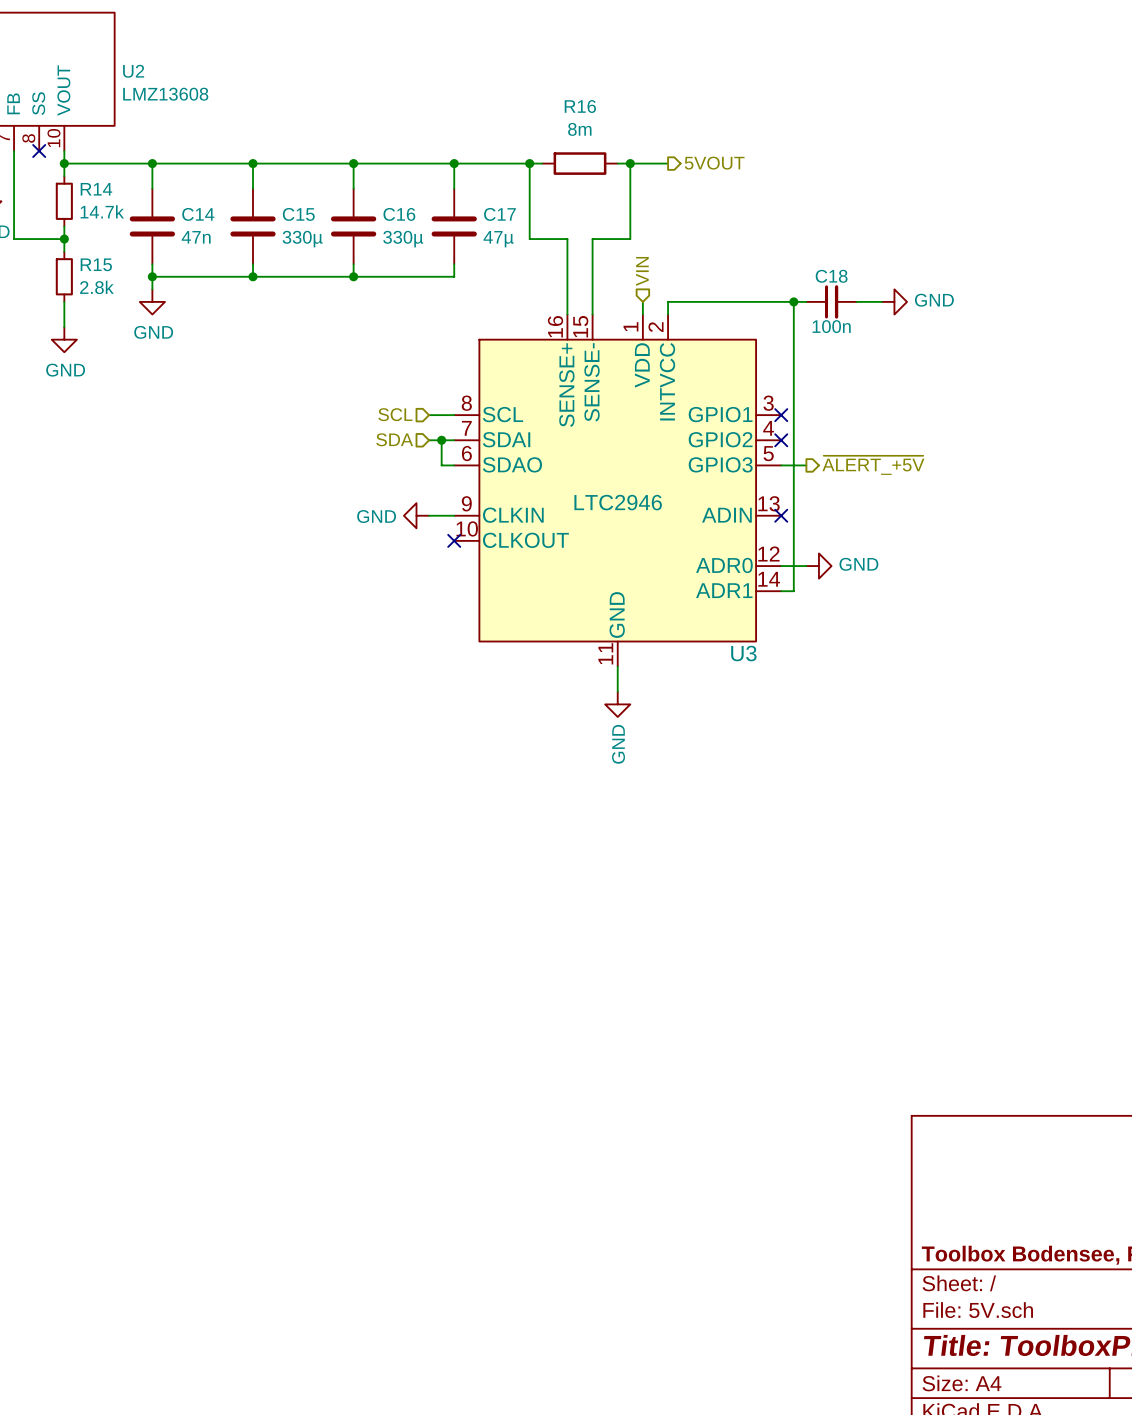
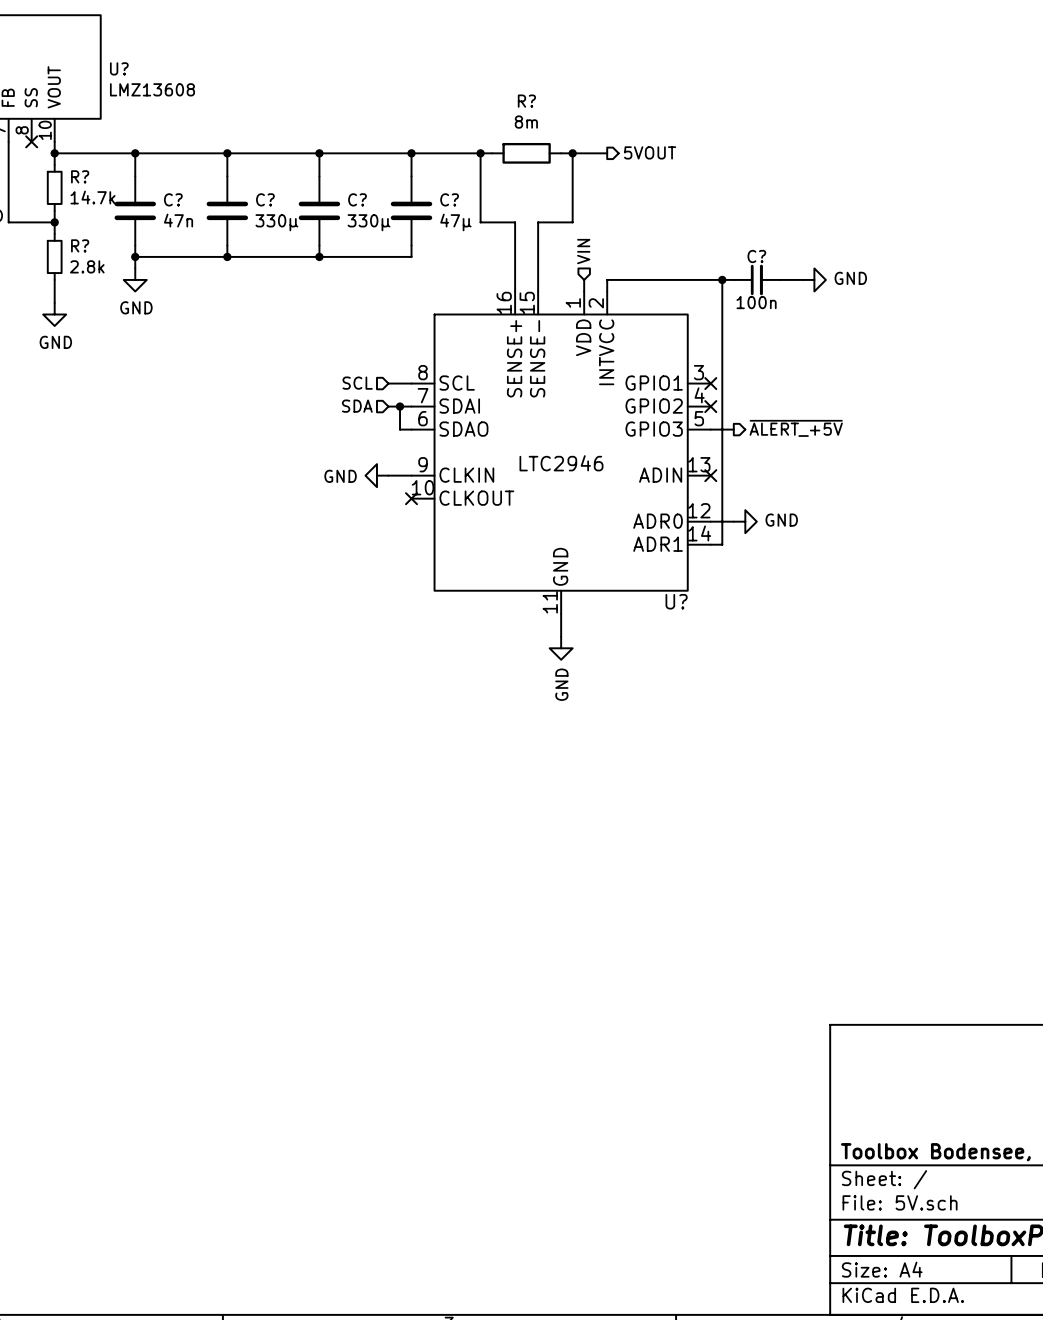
U2 name: U2 (133, 71) -> U? (119, 68)
R16 name: R16 (580, 106) -> R? (526, 101)
R14 name: R14 (96, 189) -> R? (80, 176)
C14 name: C14 (198, 214) -> C? (173, 199)
C15 name: C15 (298, 214) -> C? (265, 199)
C16 name: C16 (399, 214) -> C? (357, 199)
C17 name: C17 (499, 214) -> C? (449, 199)
R15 name: R15 (96, 264) -> R? (80, 245)
C18 name: C18 (831, 276) -> C? (756, 256)
U3 name: U3 (743, 653) -> U? (676, 601)

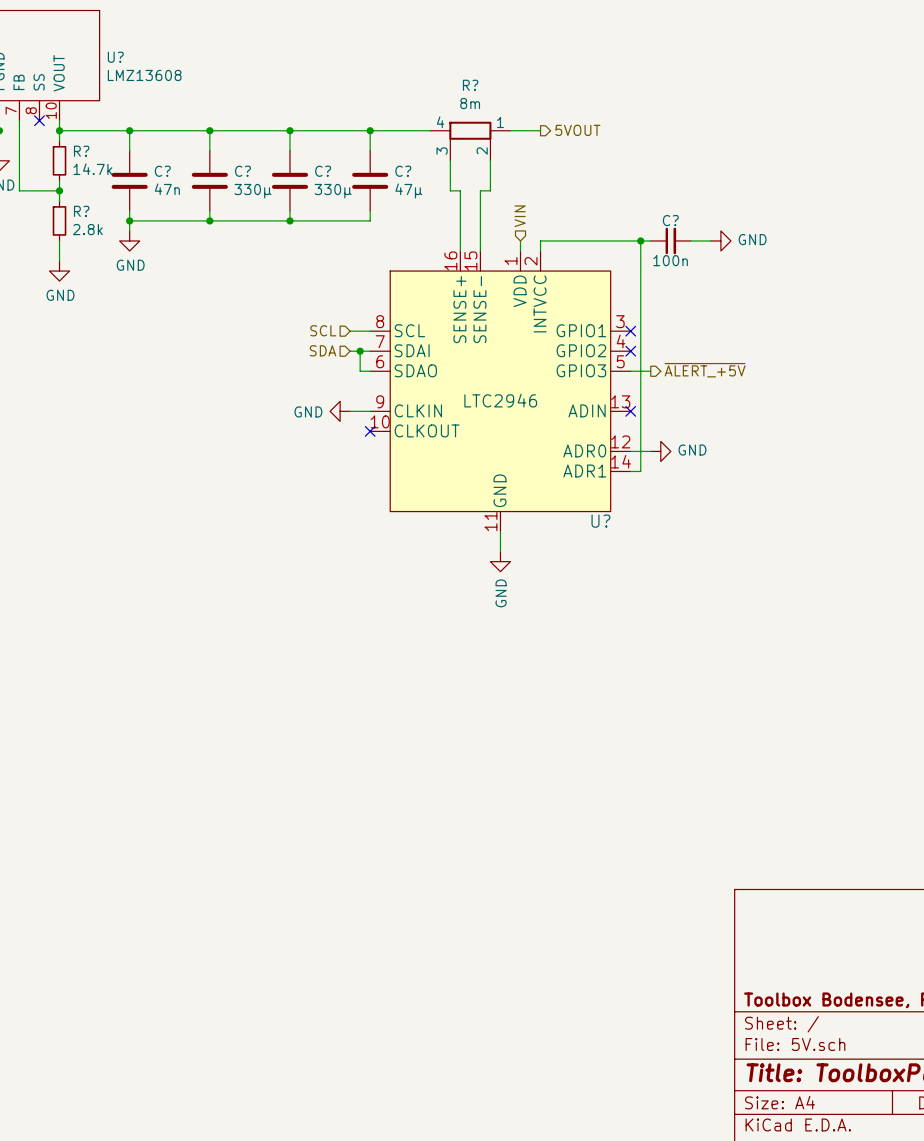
junction: (480, 153) -> none
wire: (492, 153) (480, 153) (480, 222) (503, 222) -> (450, 160) (450, 190)
R?: 8m (526, 153) -> none
wire: (561, 153) (572, 153) (572, 222) (549, 222) -> (490, 160) (490, 190)
junction: (572, 153) -> none
R?: none -> 8m (470, 141)

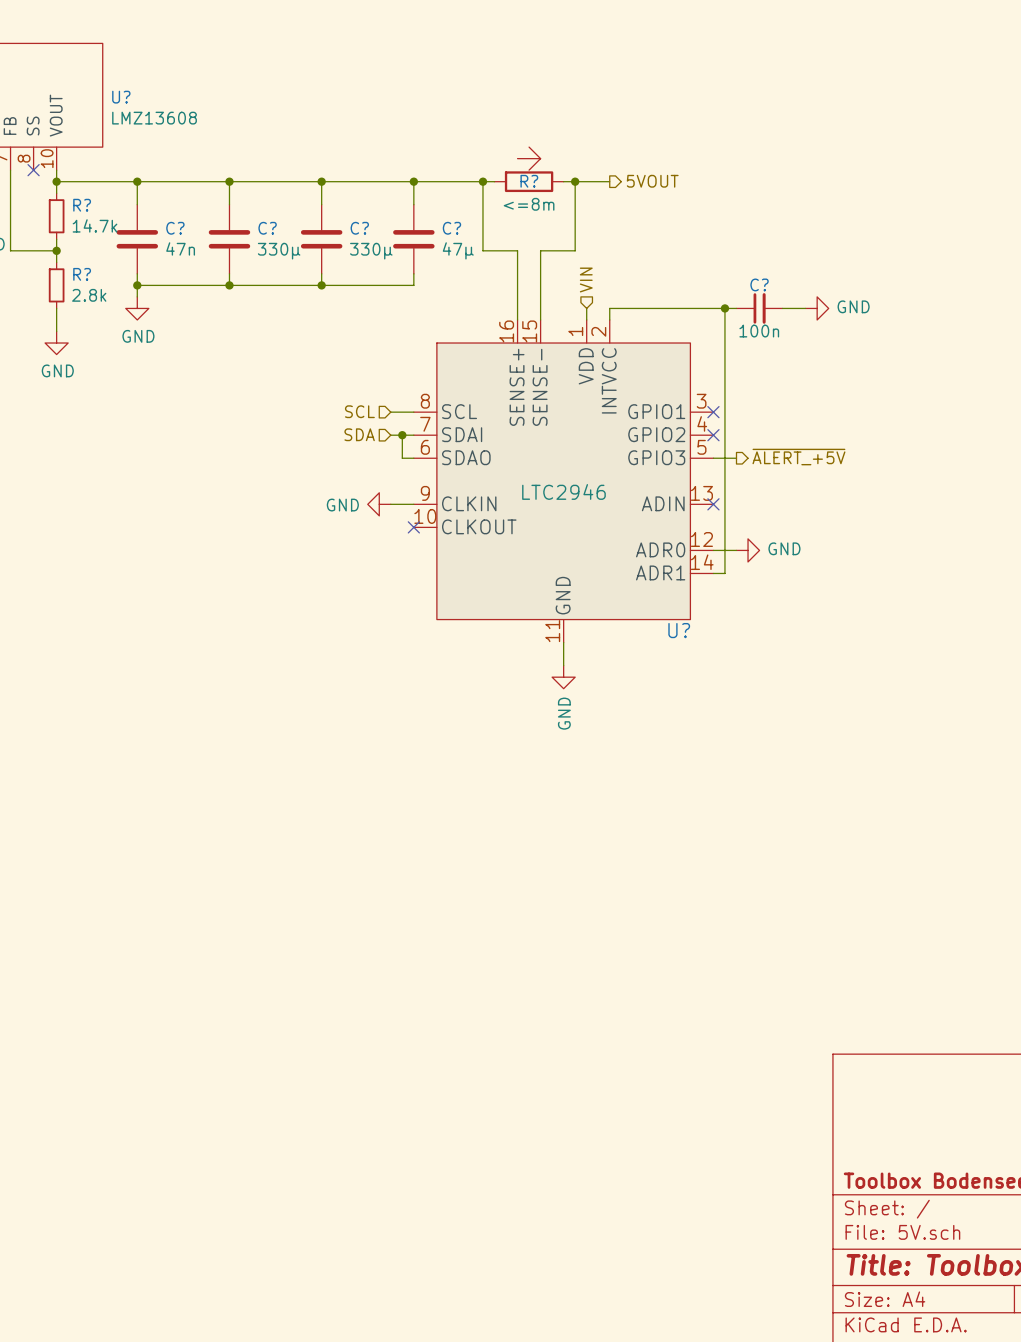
R?: none -> <=8m (529, 169)
junction: none -> (482, 181)
junction: none -> (575, 181)
R?: 8m (470, 141) -> none
wire: (450, 160) (450, 190) -> (494, 181) (482, 181) (482, 250) (506, 250)
wire: (490, 160) (490, 190) -> (563, 181) (575, 181) (575, 250) (552, 250)

